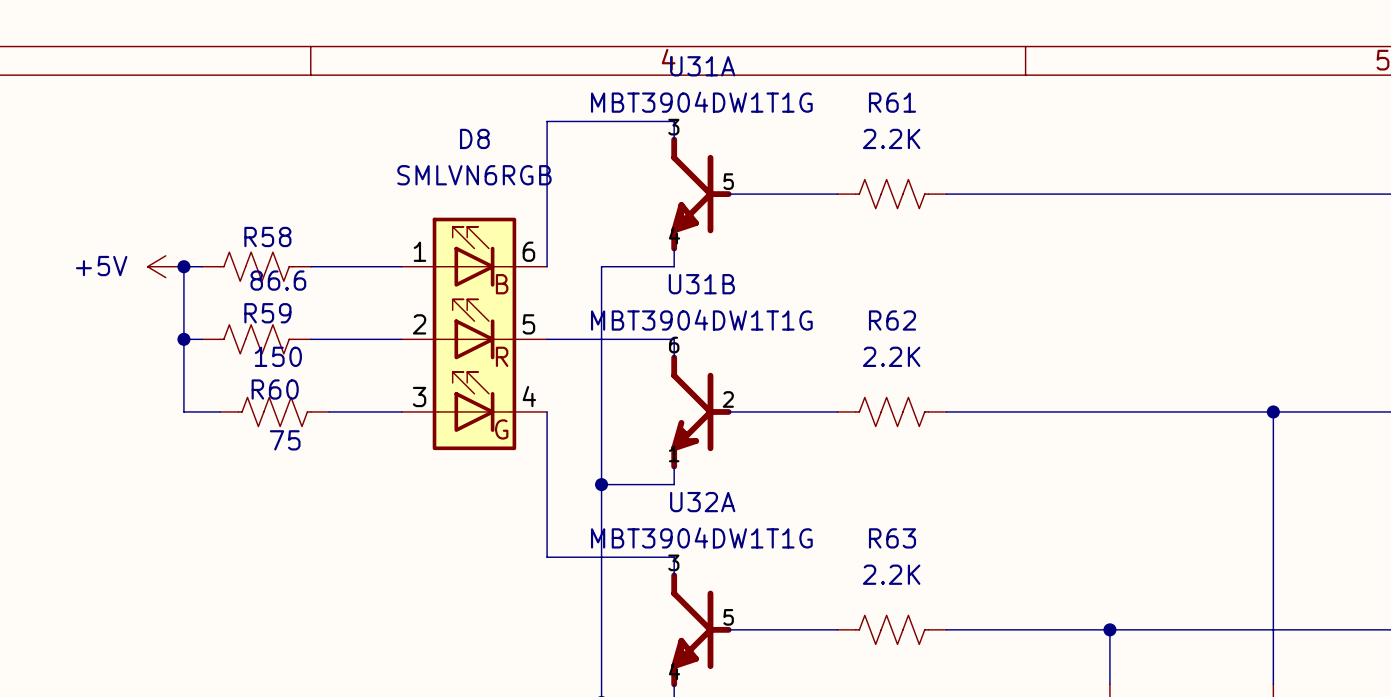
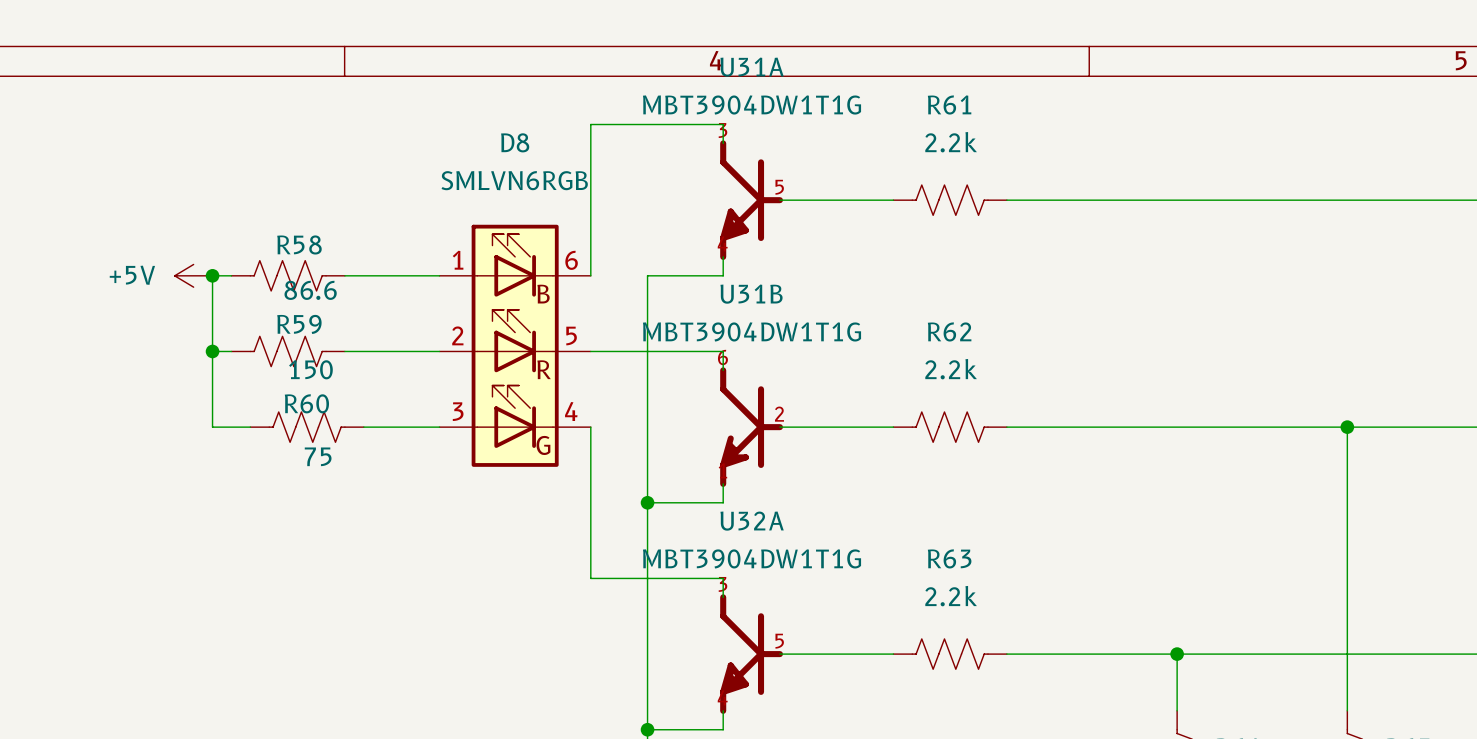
R61 value: 2.2K (891, 138) -> 2.2k (951, 142)
R62 value: 2.2K (891, 356) -> 2.2k (951, 369)
R63 value: 2.2K (891, 574) -> 2.2k (951, 596)

